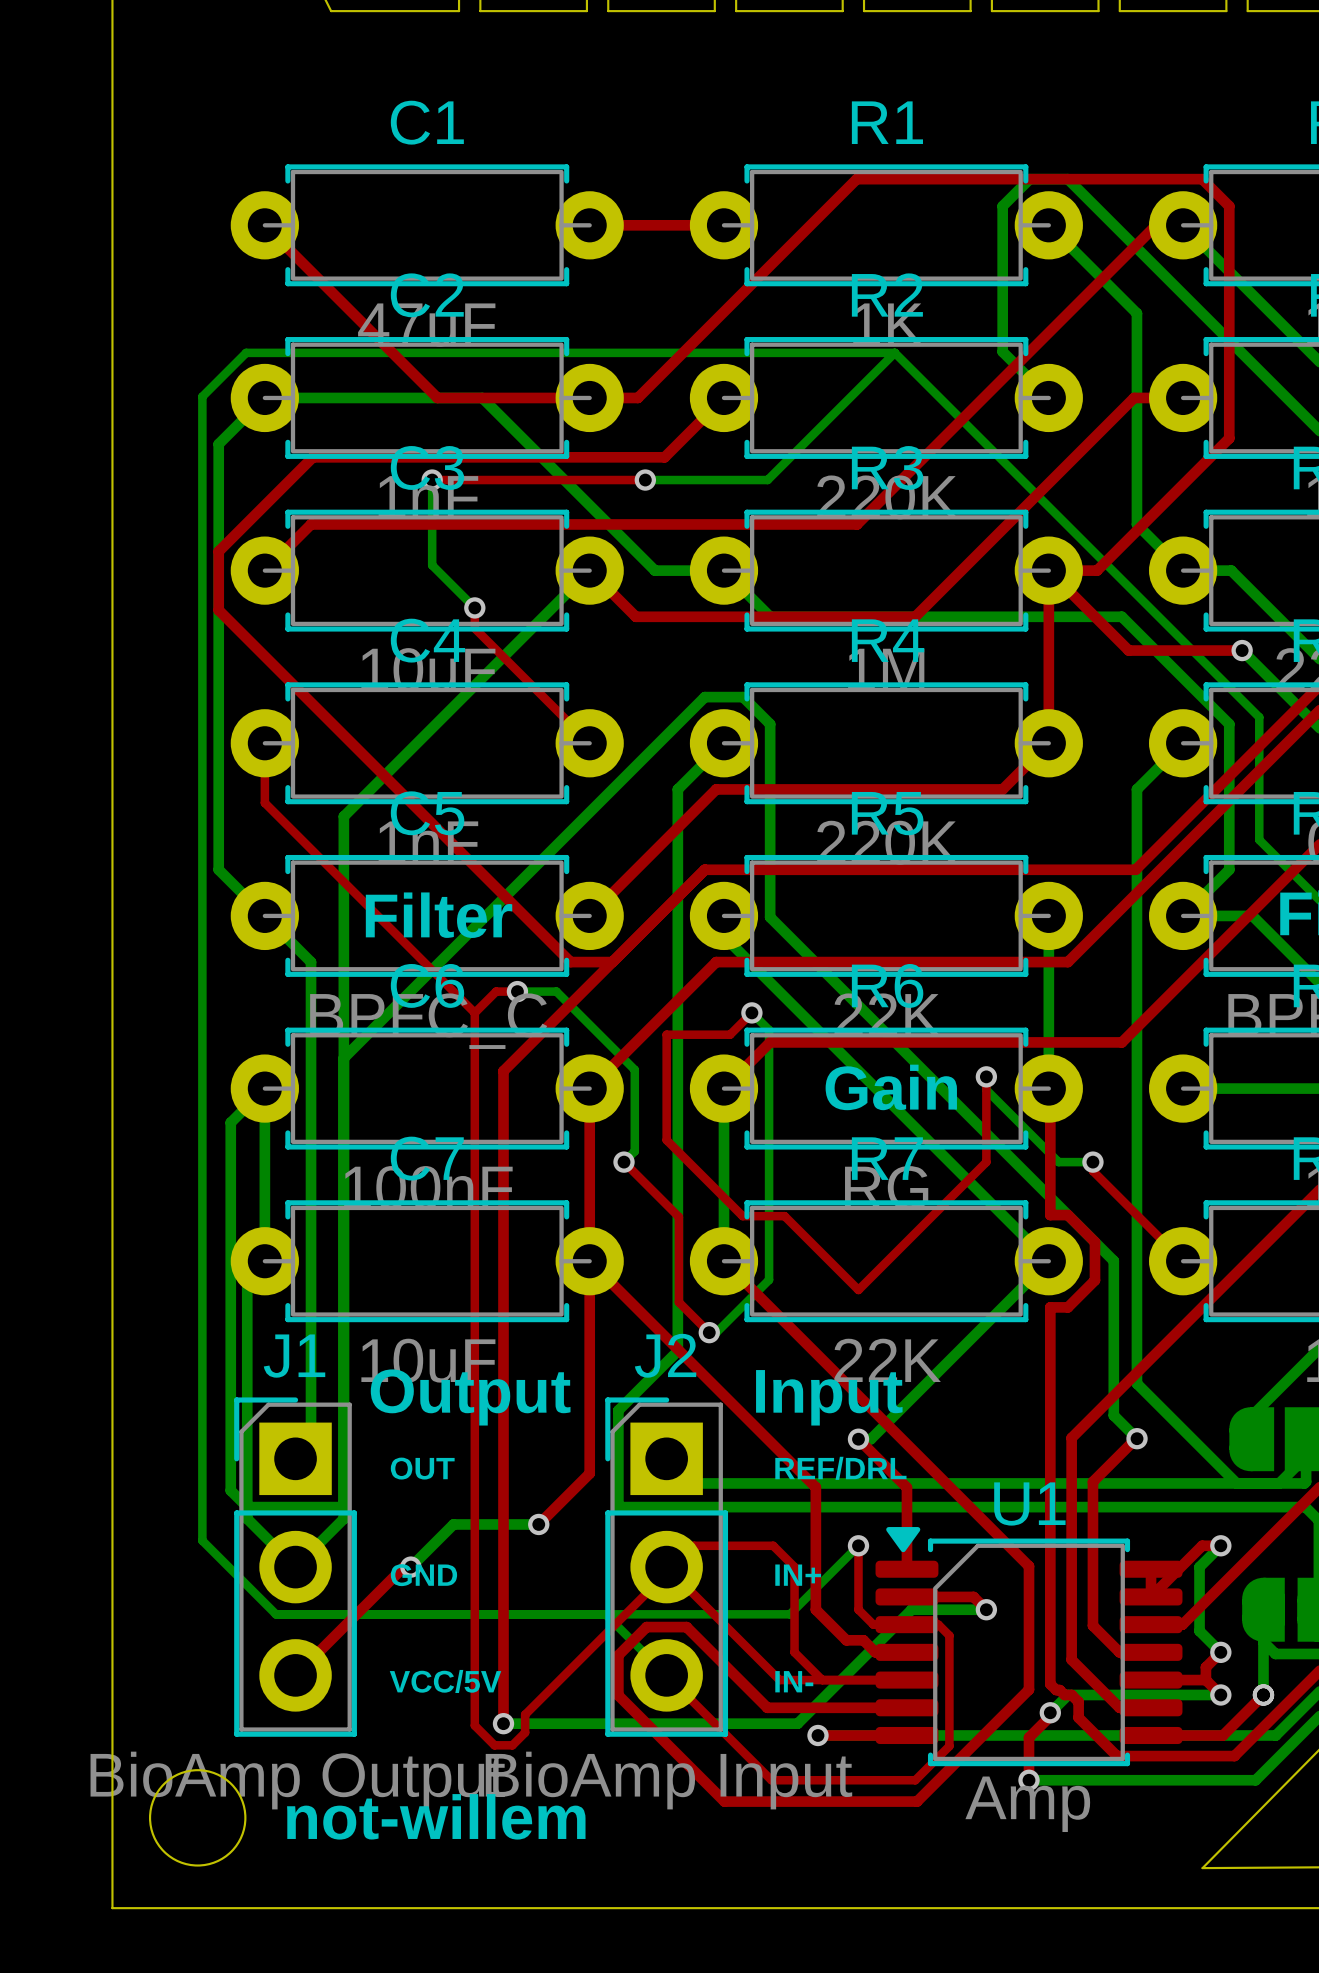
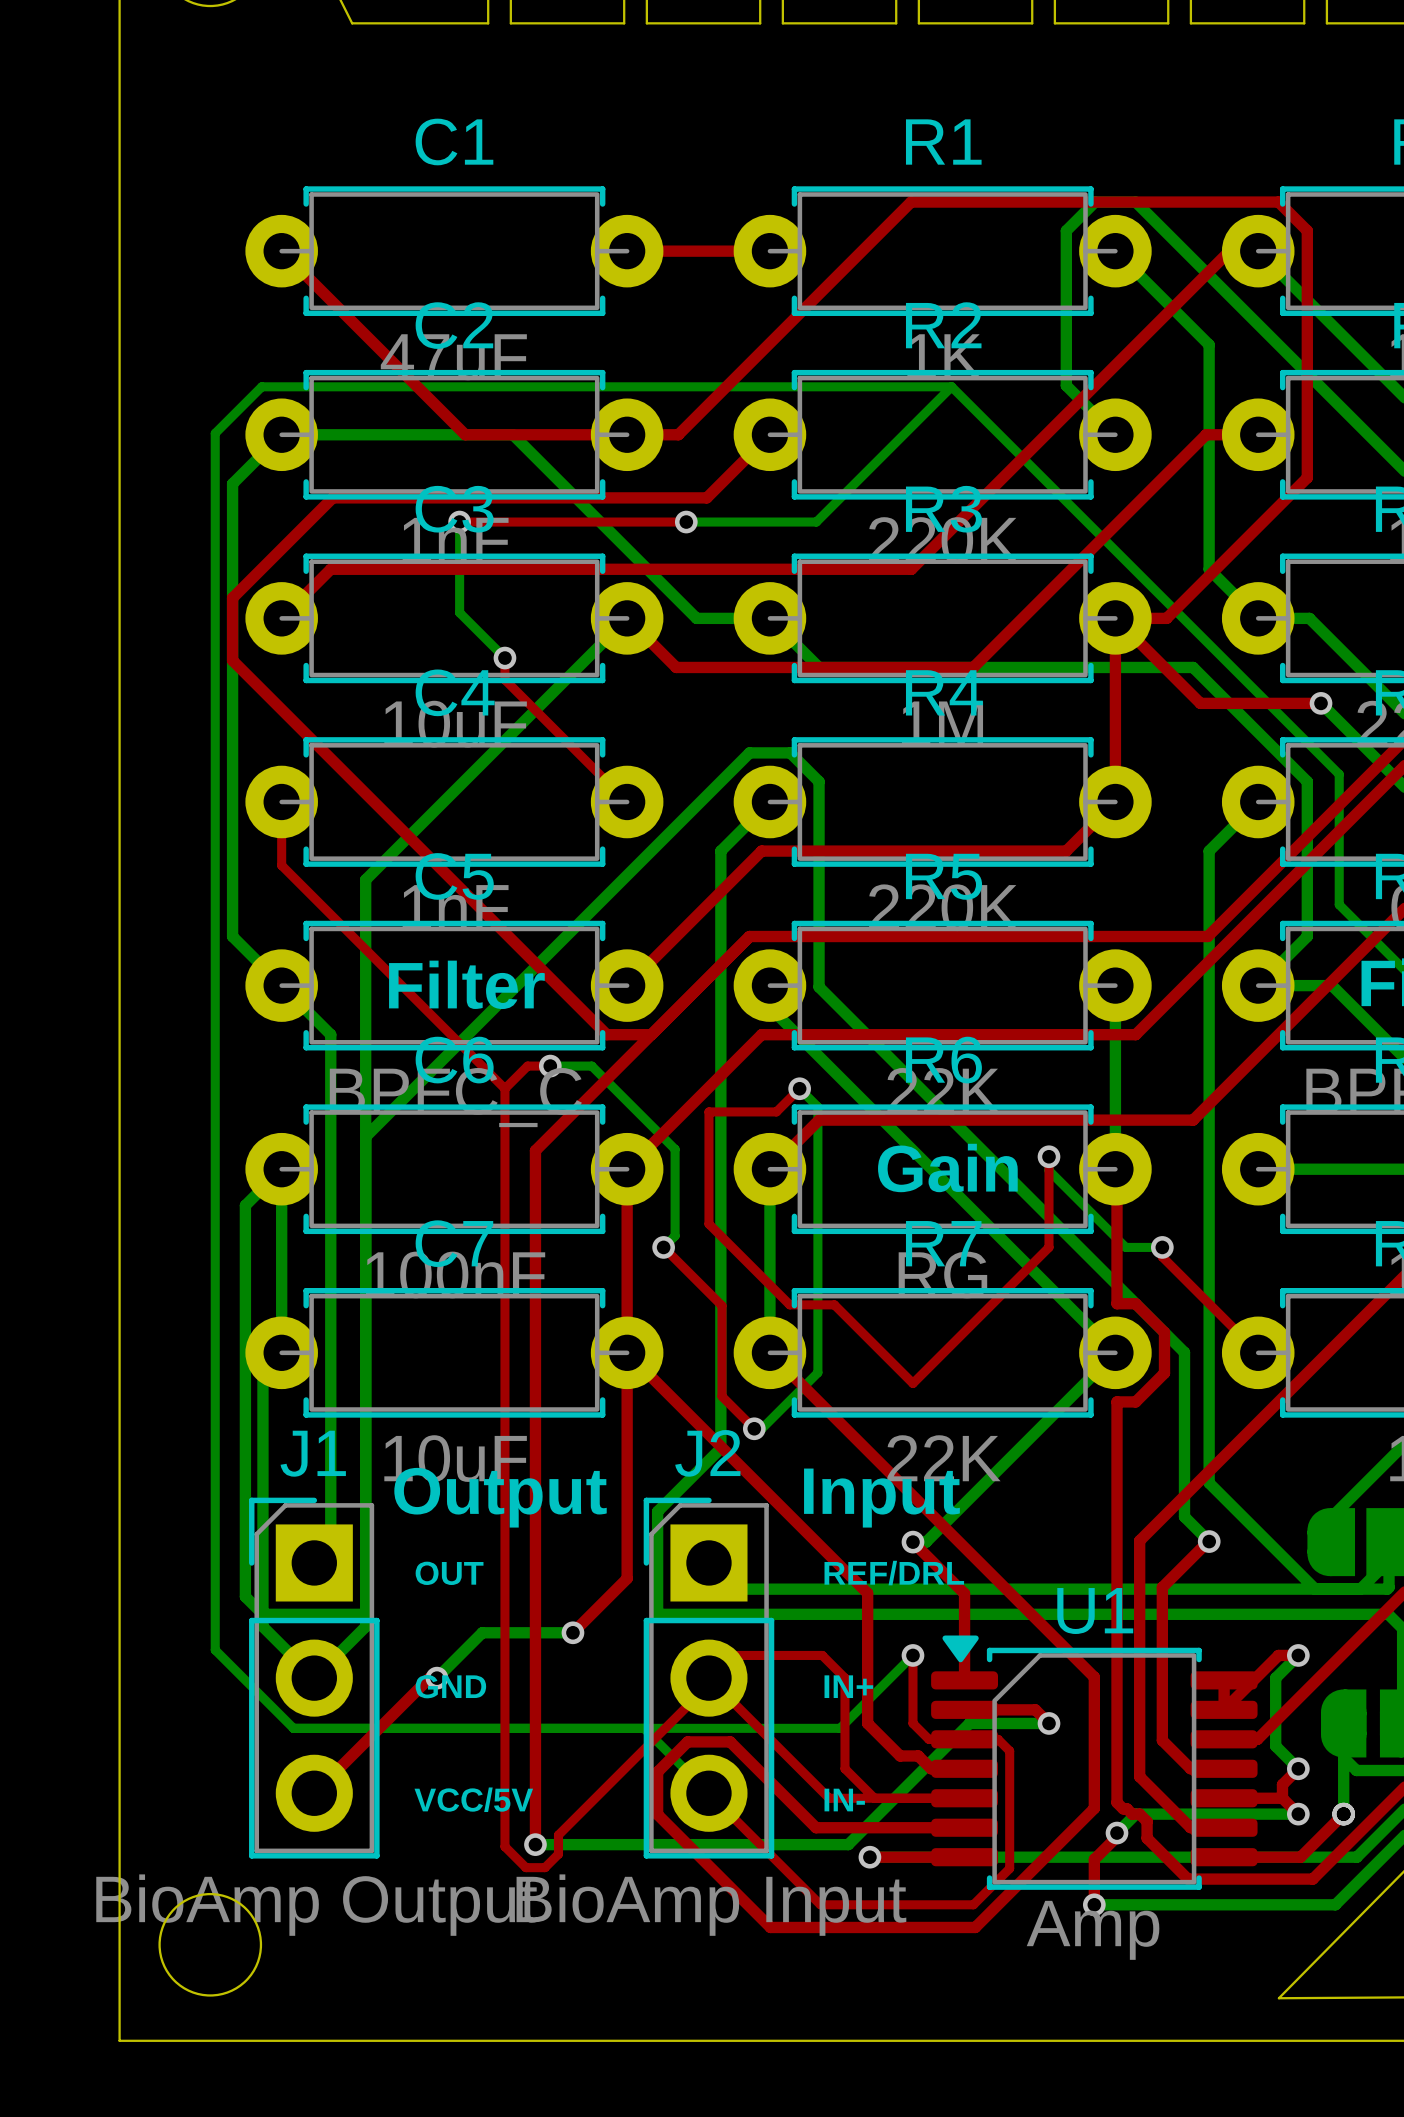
text: not-willem (436, 1816) -> none

